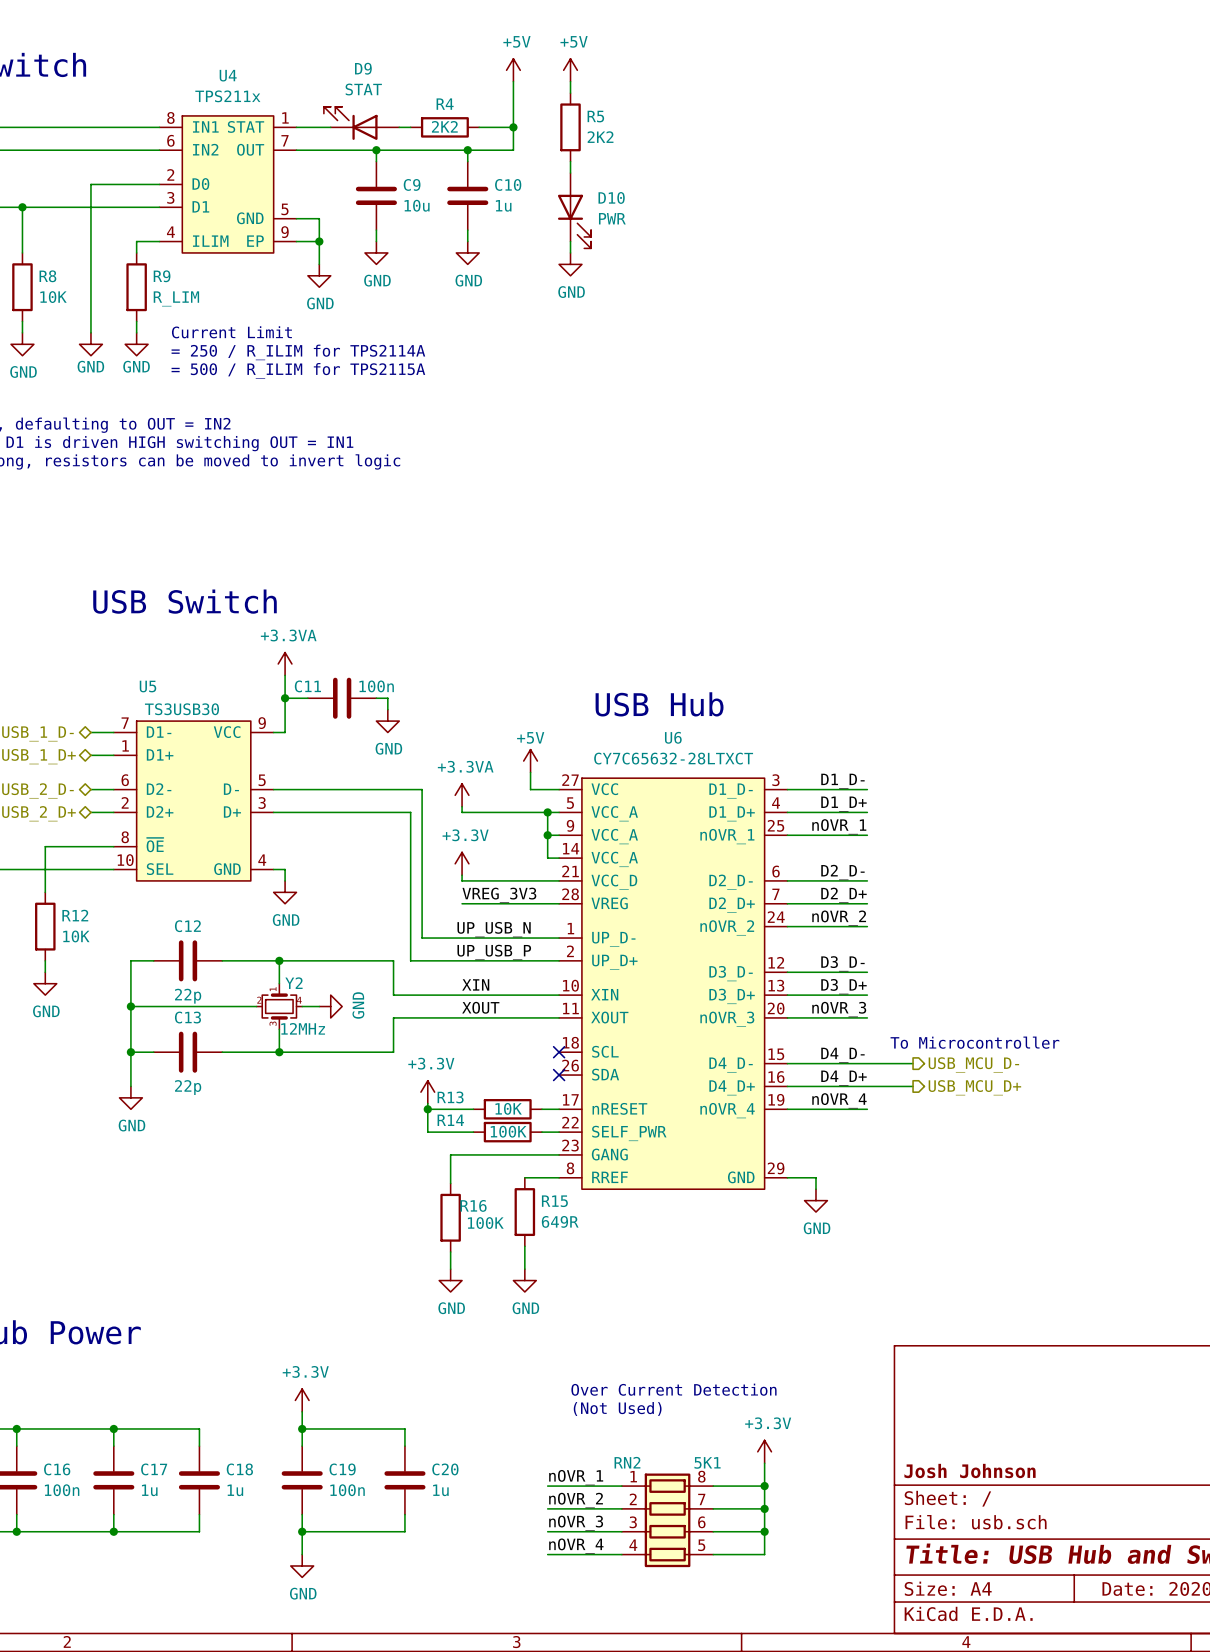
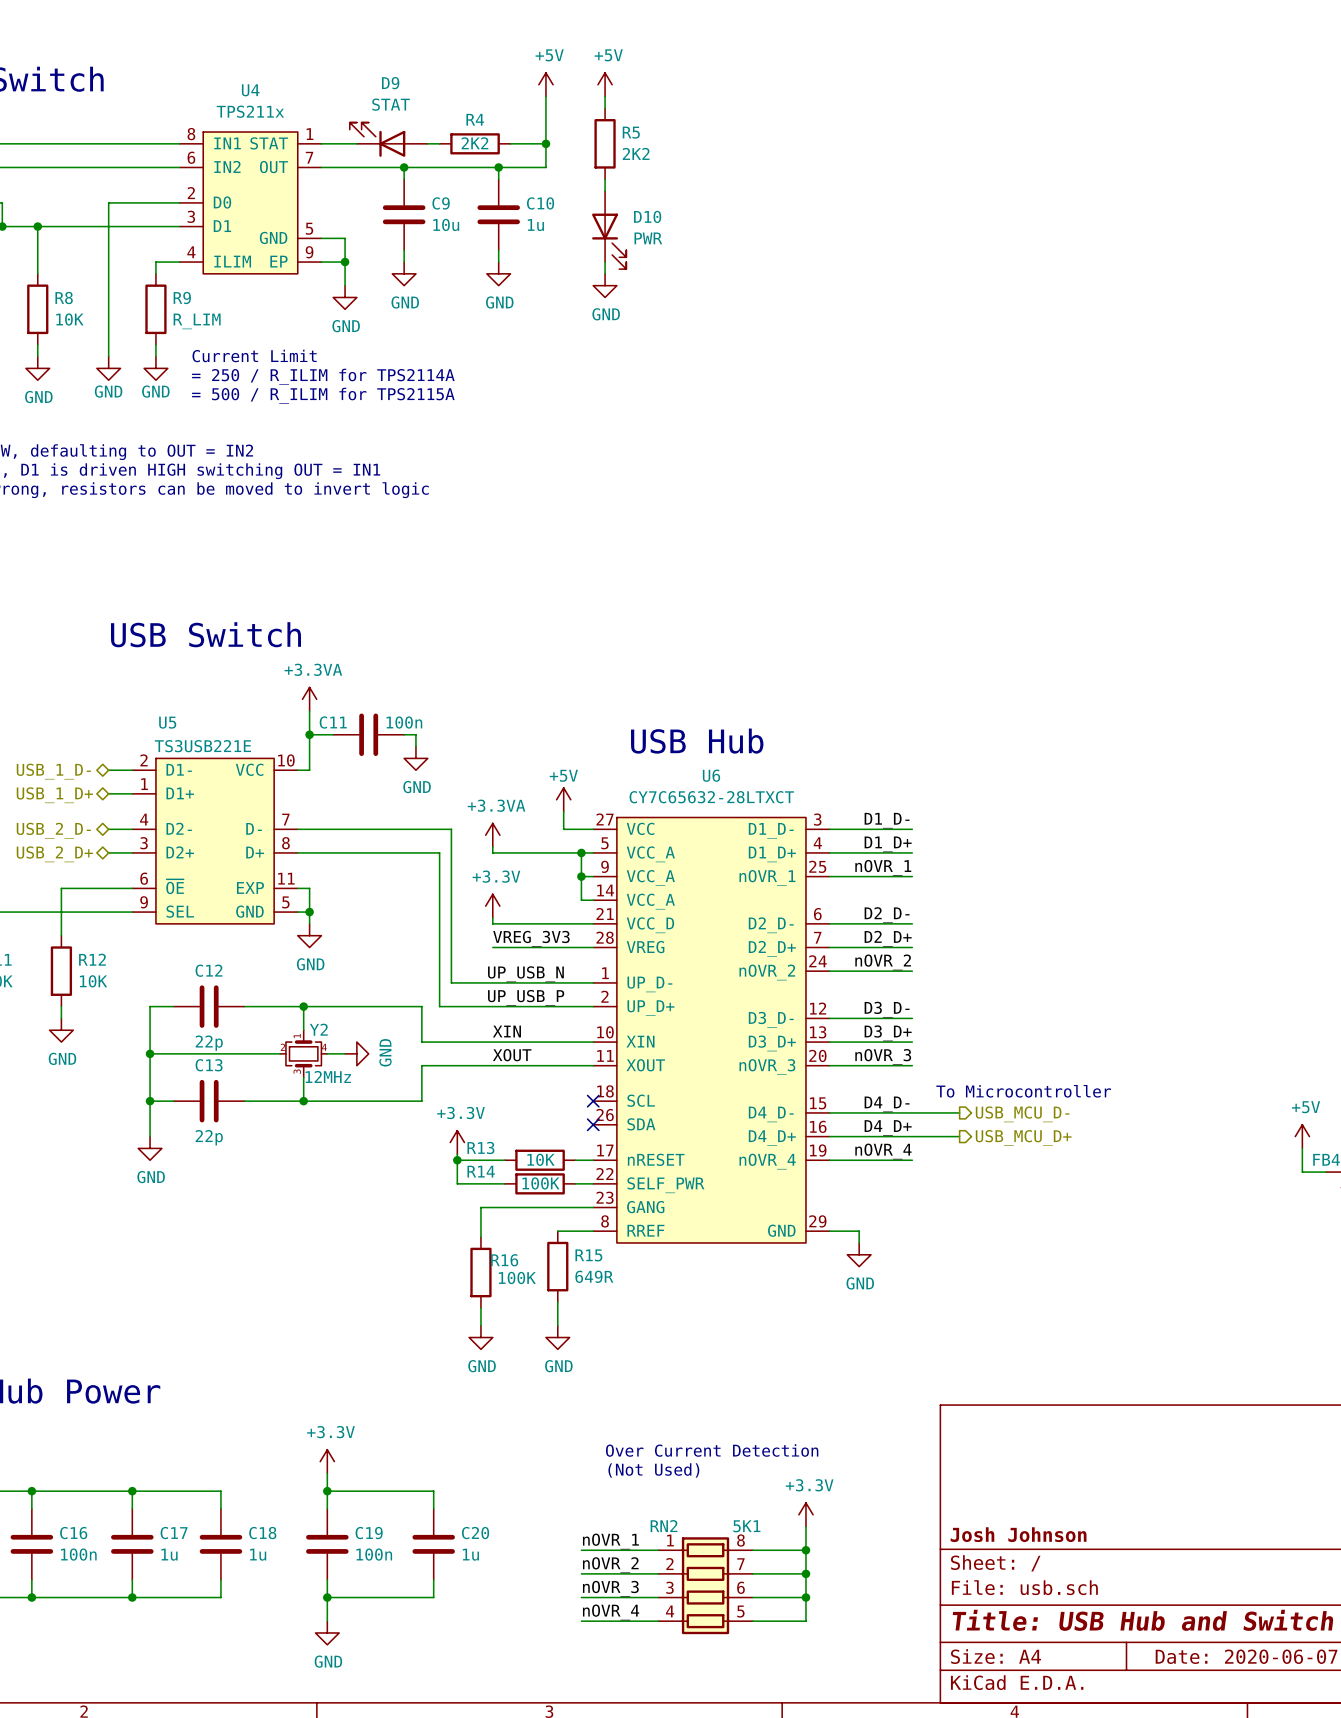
U5 value: TS3USB30 (181, 709) -> TS3USB221E (202, 746)
U5 symbol: [113, 721, 274, 881] -> [132, 758, 298, 924]
wire: none -> (297, 888) (309, 888) (309, 912)
junction: none -> (309, 912)

